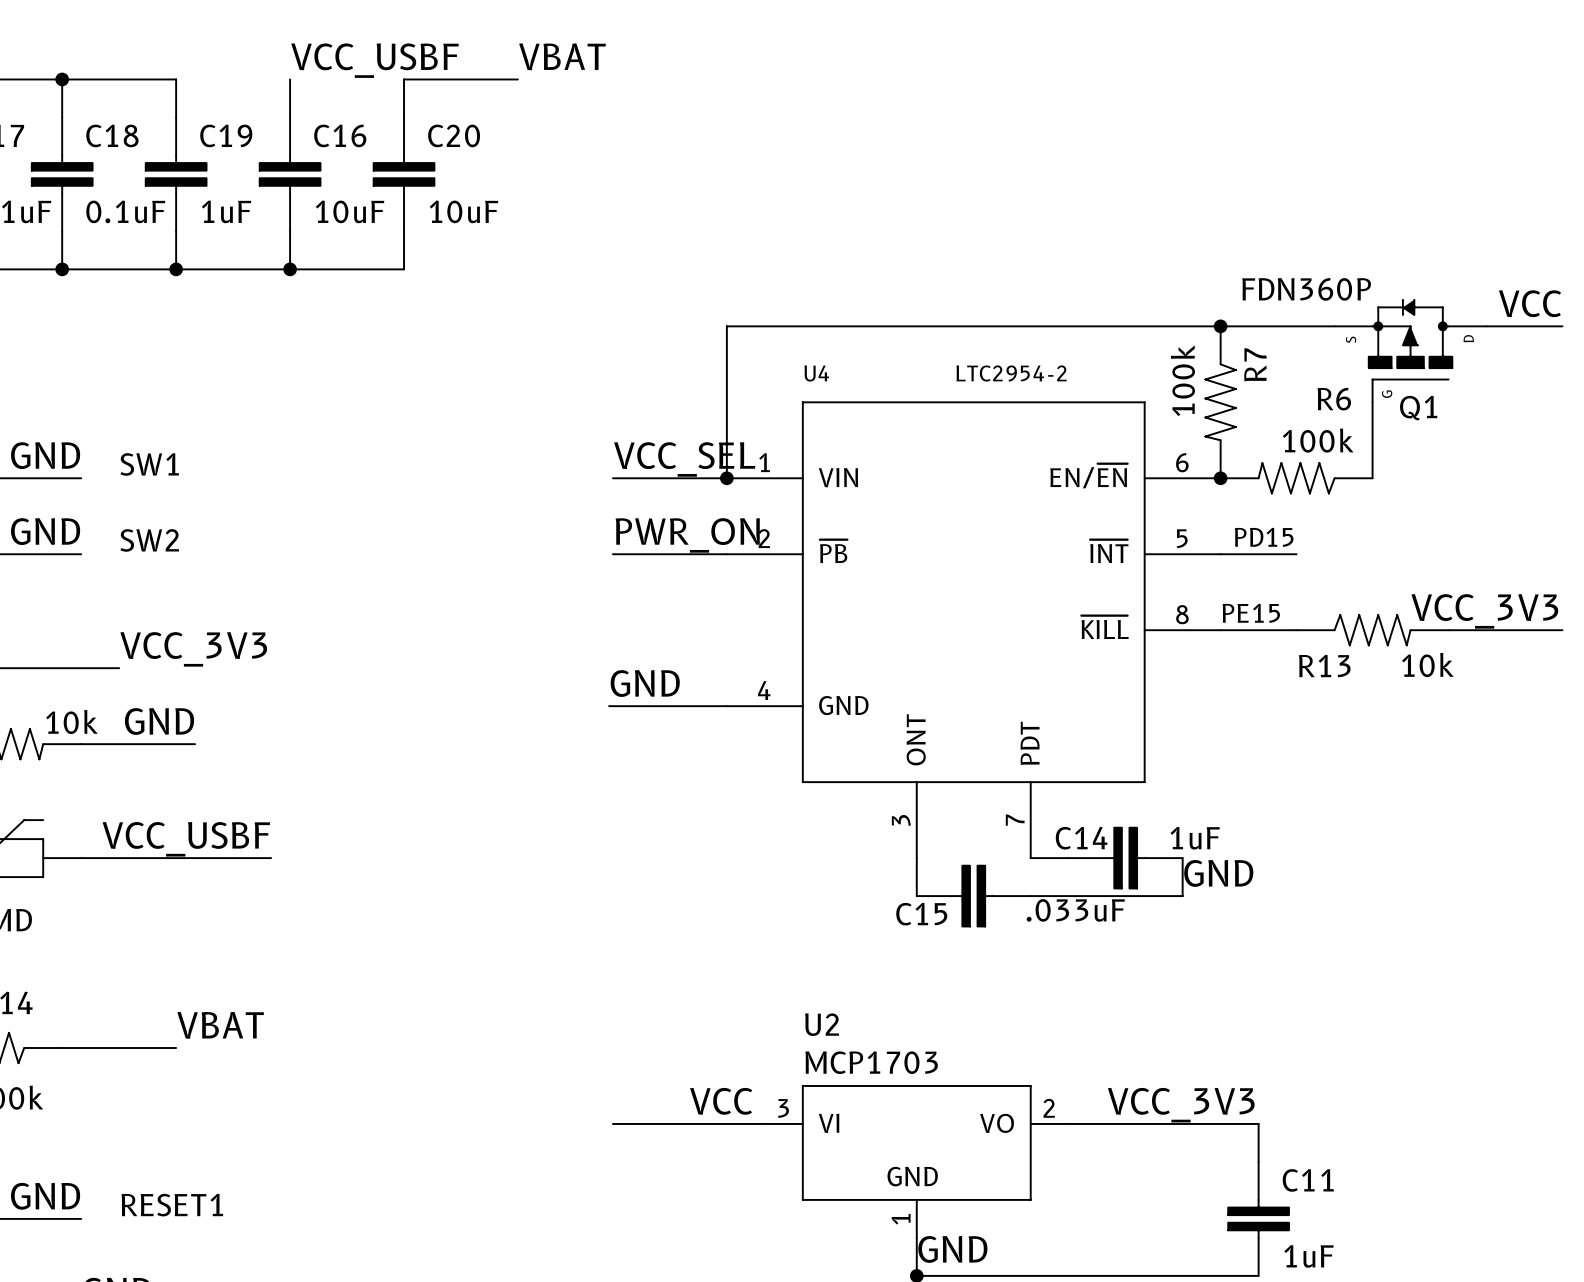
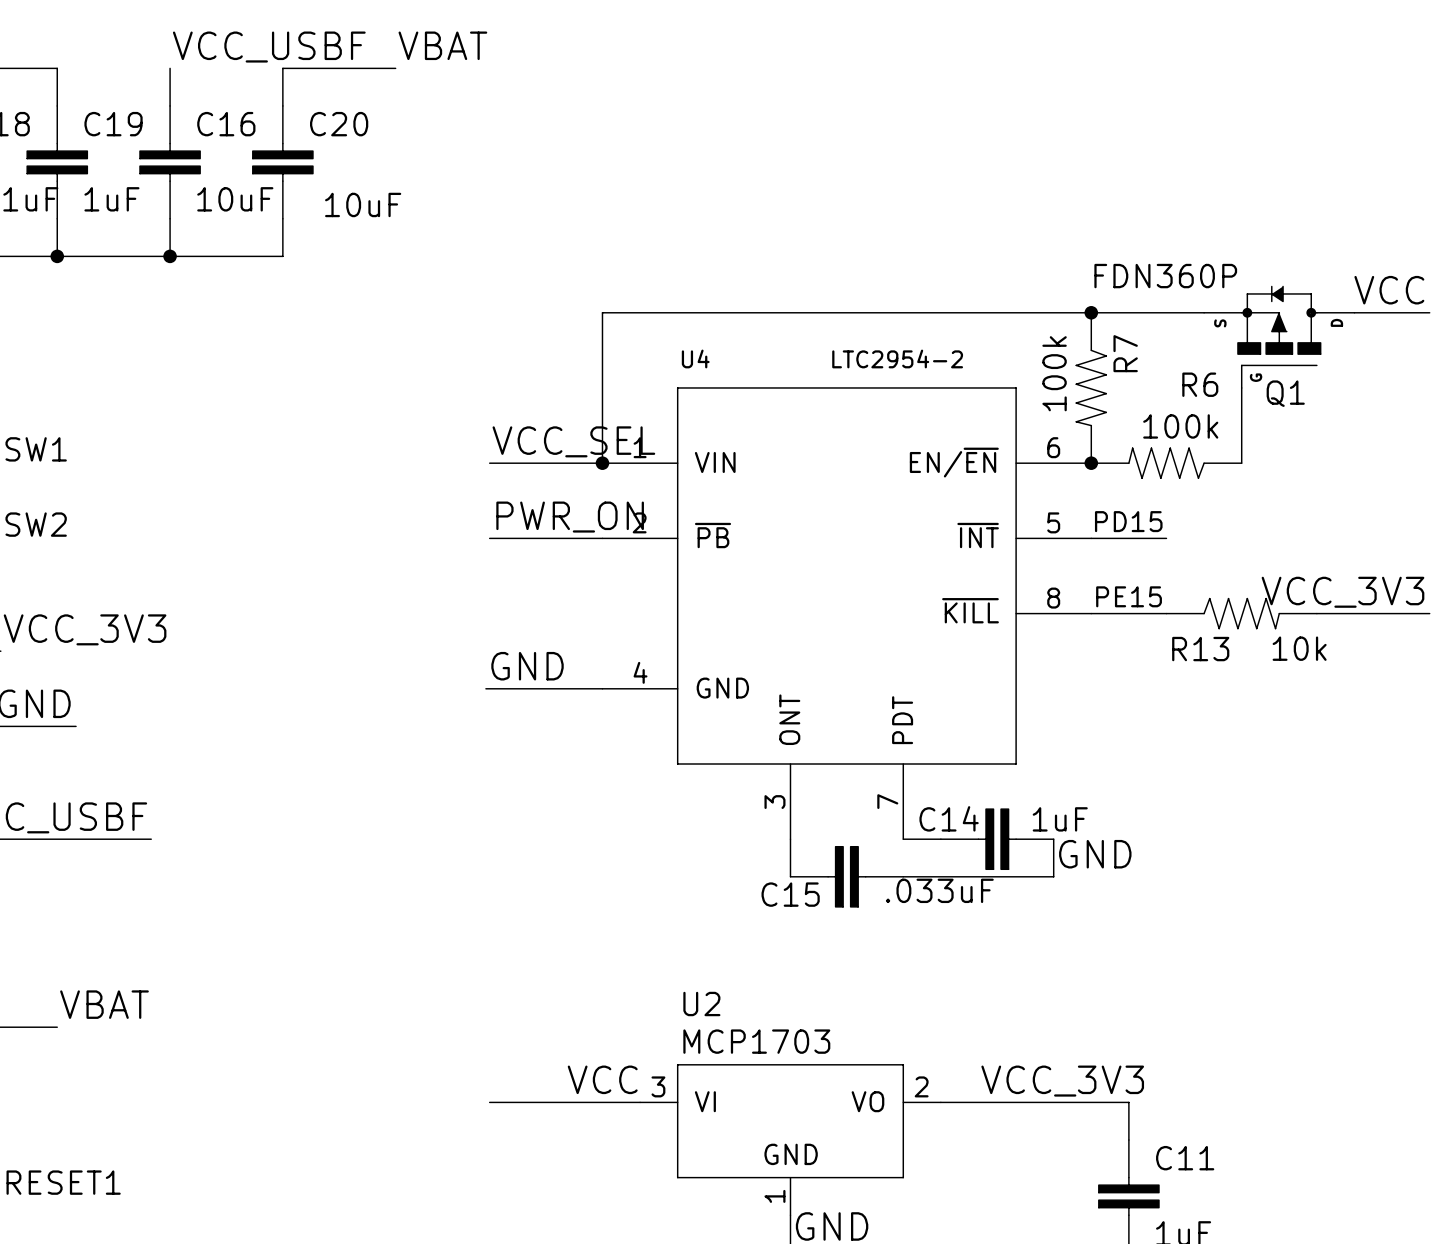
C20 value position: 10uF (463, 211) -> 10uF (363, 204)

